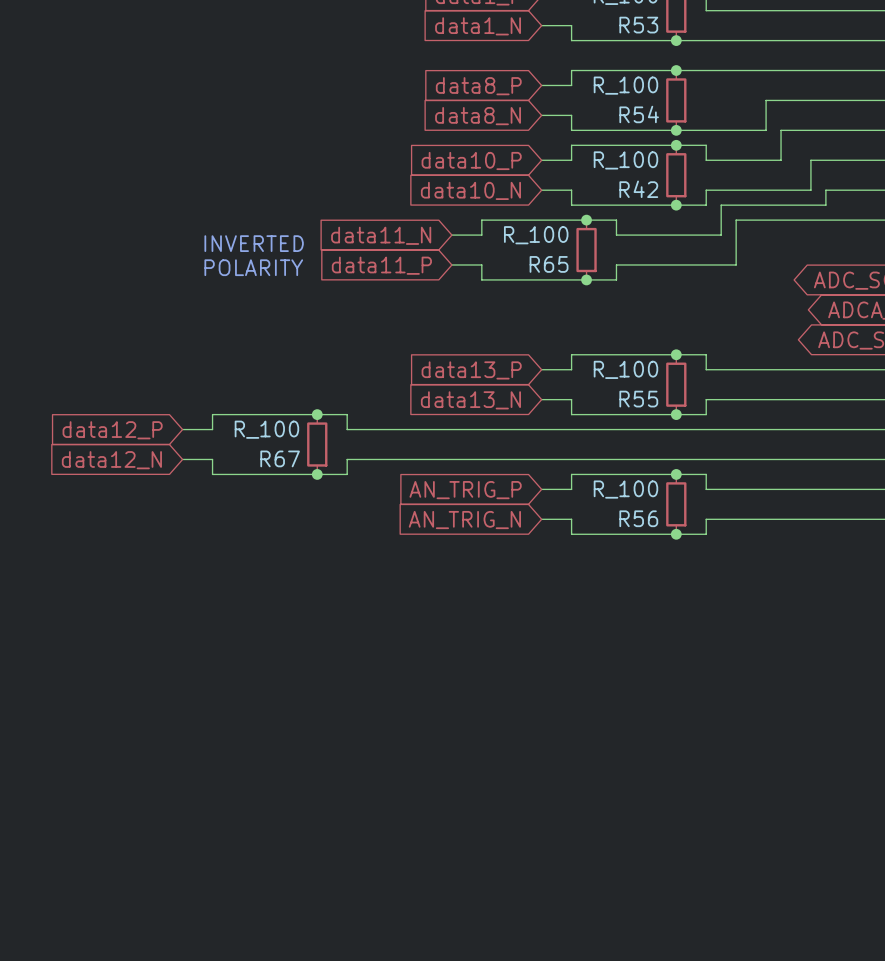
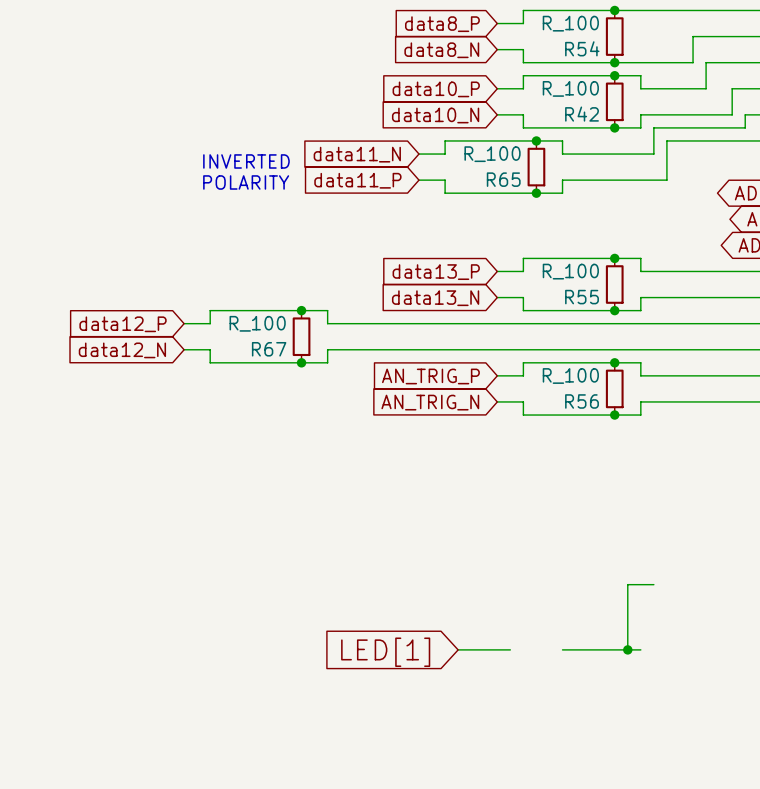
wire: none -> (653, 584) (627, 584) (627, 649)
wire: none -> (458, 649) (510, 649)
wire: none -> (562, 649) (640, 649)
junction: none -> (627, 649)
global label: none -> LED[1] (385, 652)

